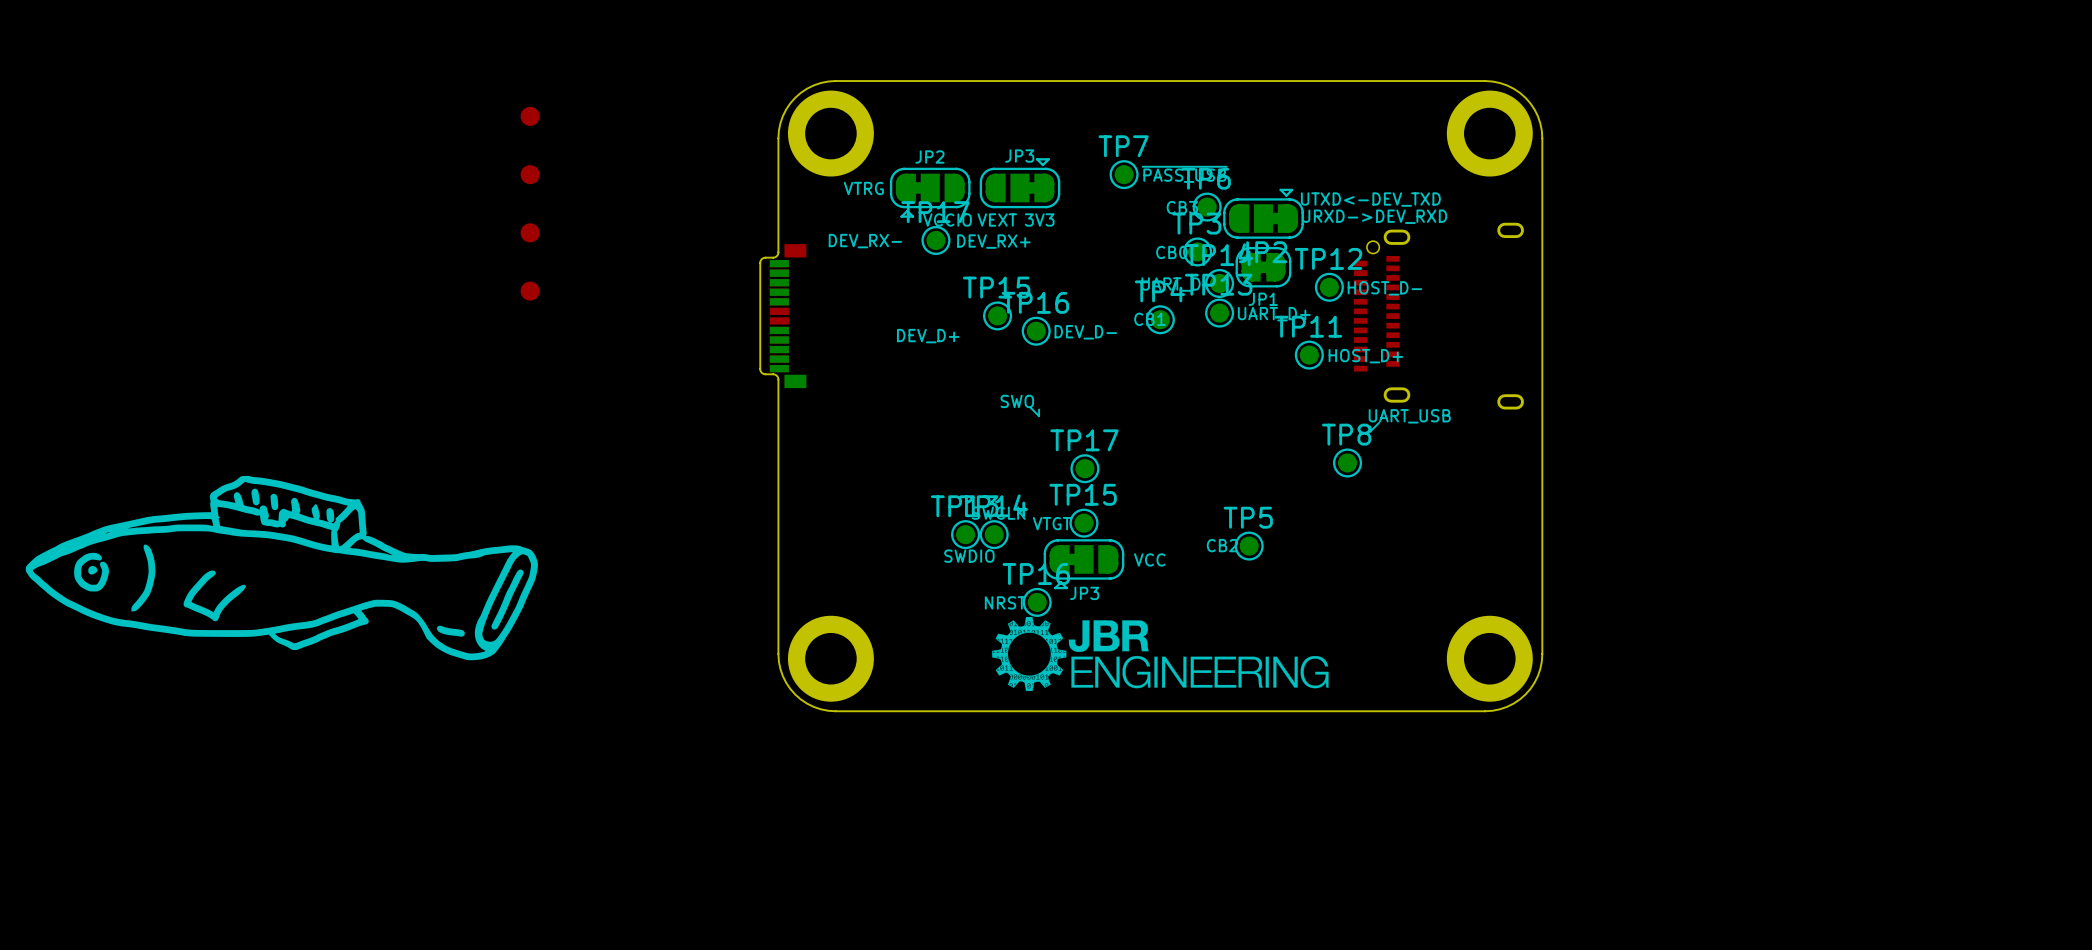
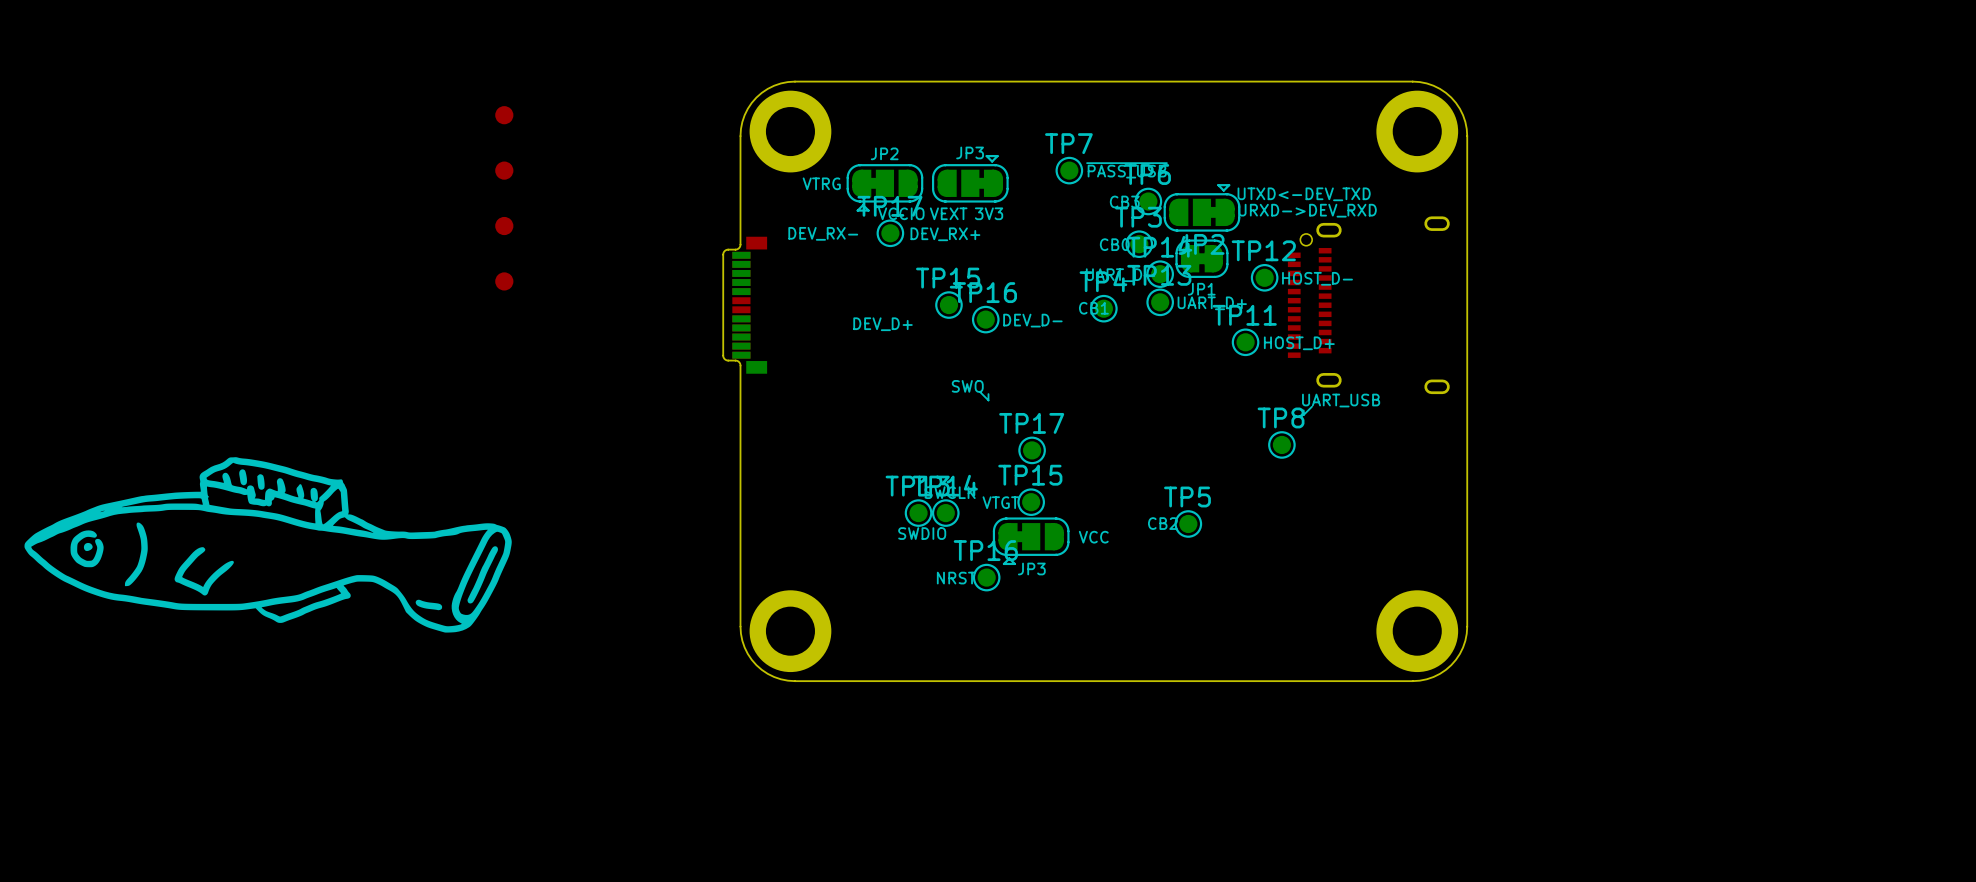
drawing: [992, 616, 1329, 692] -> none

